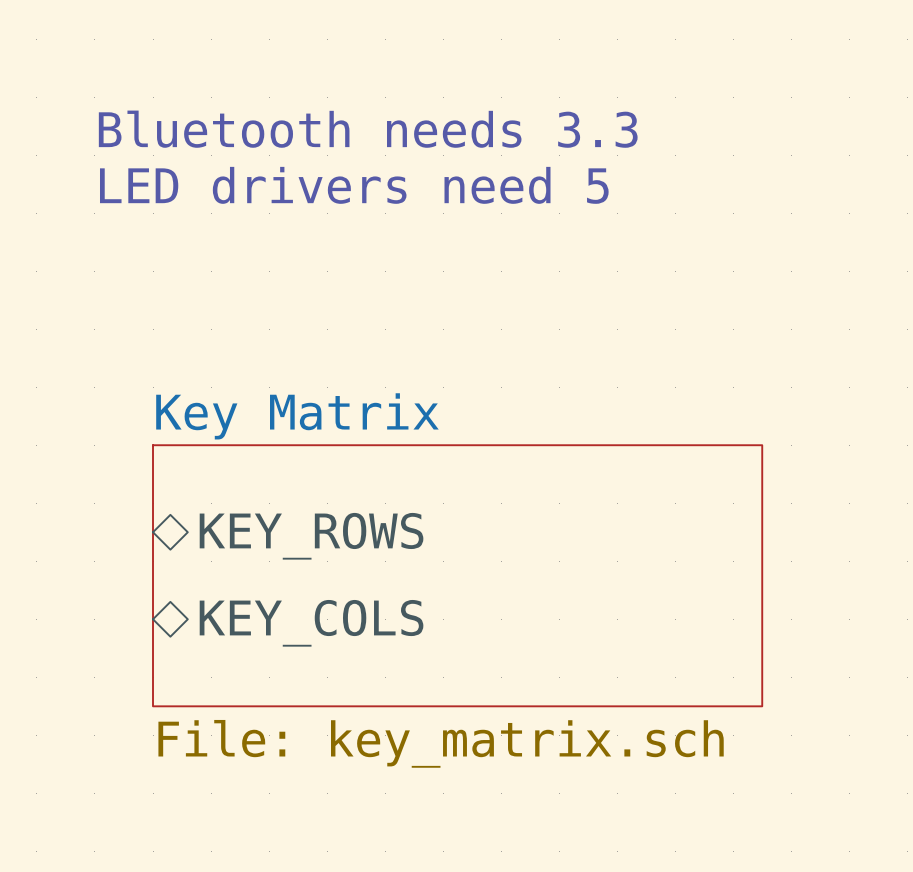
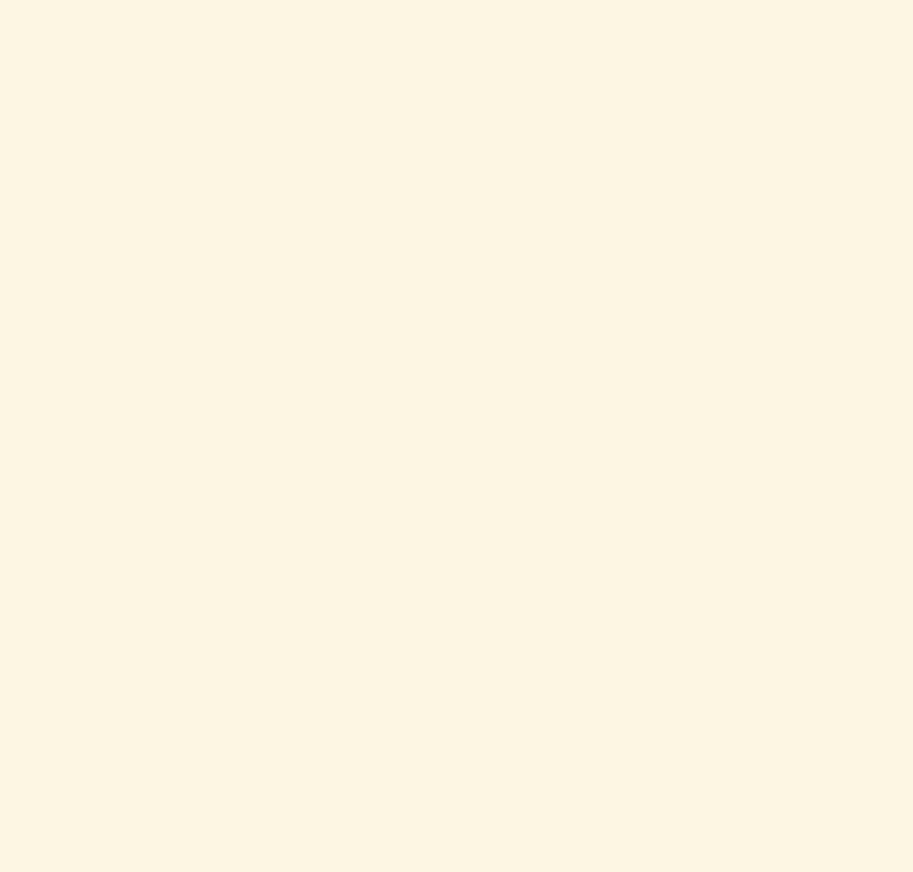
text: Bluetooth needs 3.3 (368, 129) -> none
text: LED drivers need 5 (354, 185) -> none
sheet pin: KEY_ROWS (311, 536) -> none
sheet Key Matrix: File: key_matrix.sch (457, 575) -> none
sheet pin: KEY_COLS (311, 623) -> none

